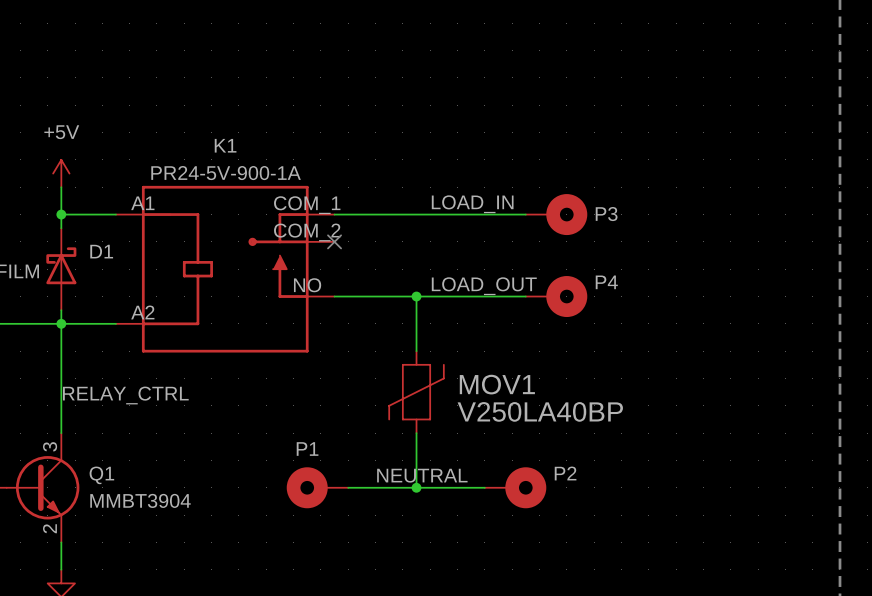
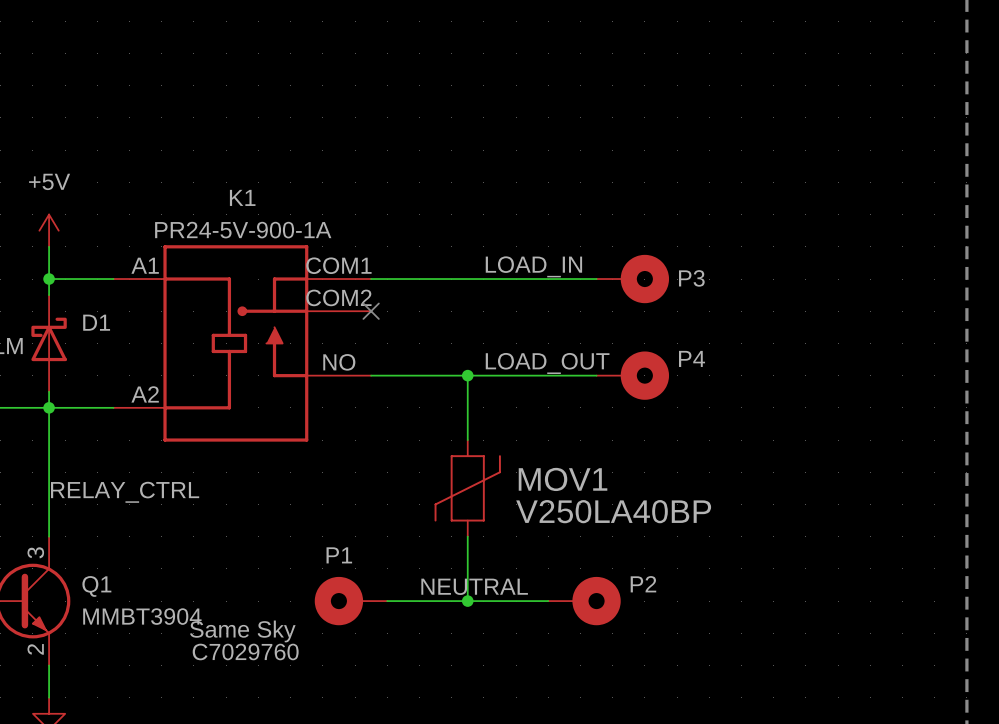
K1 symbol: [115, 185, 335, 353] -> [113, 245, 372, 442]
K1 text: none -> Same Sky (242, 631)
K1 text: none -> C7029760 (245, 651)

